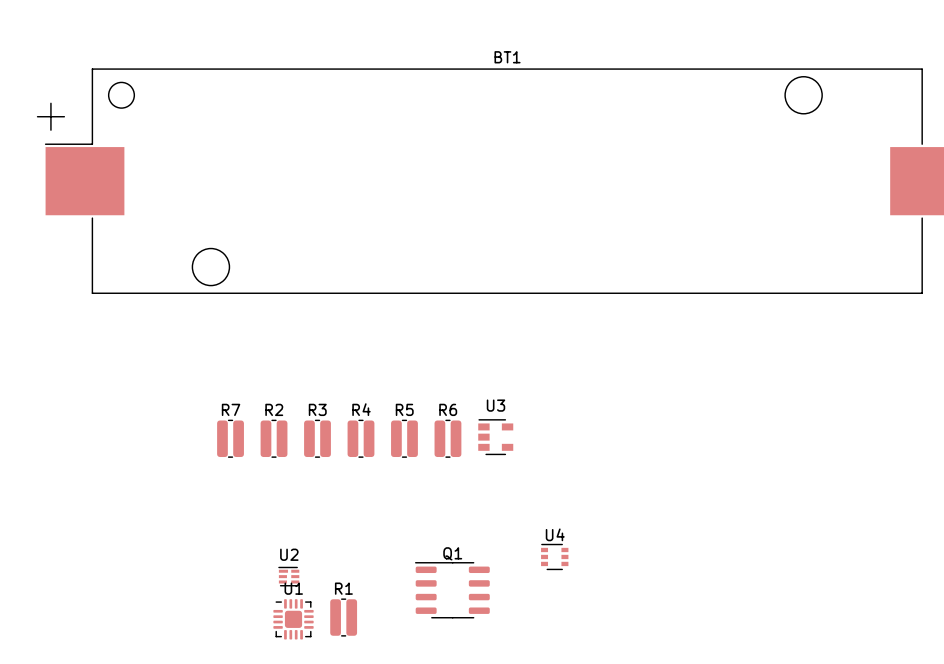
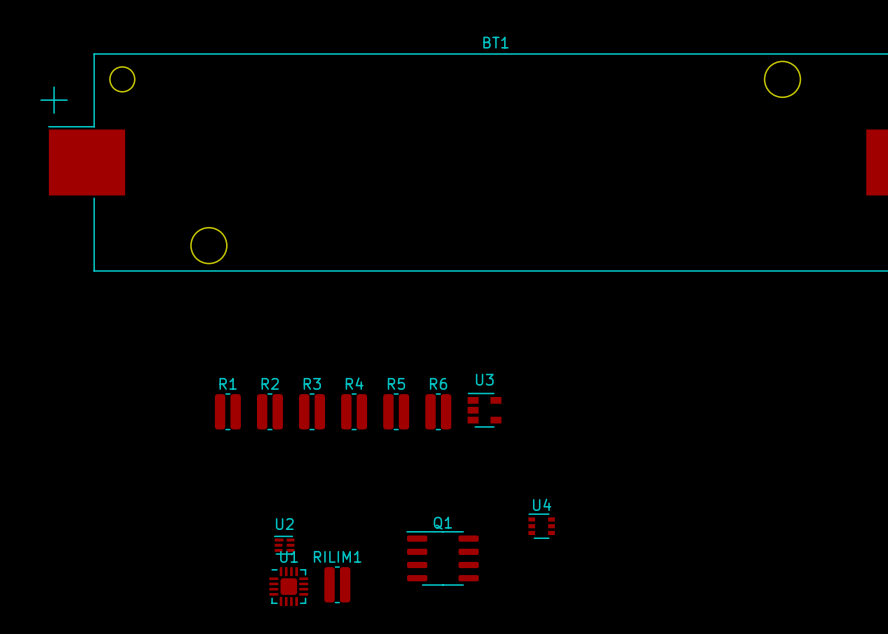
R7 name: R7 (231, 409) -> R1 (228, 383)
R1 name: R1 (343, 588) -> RILIM1 (337, 556)

